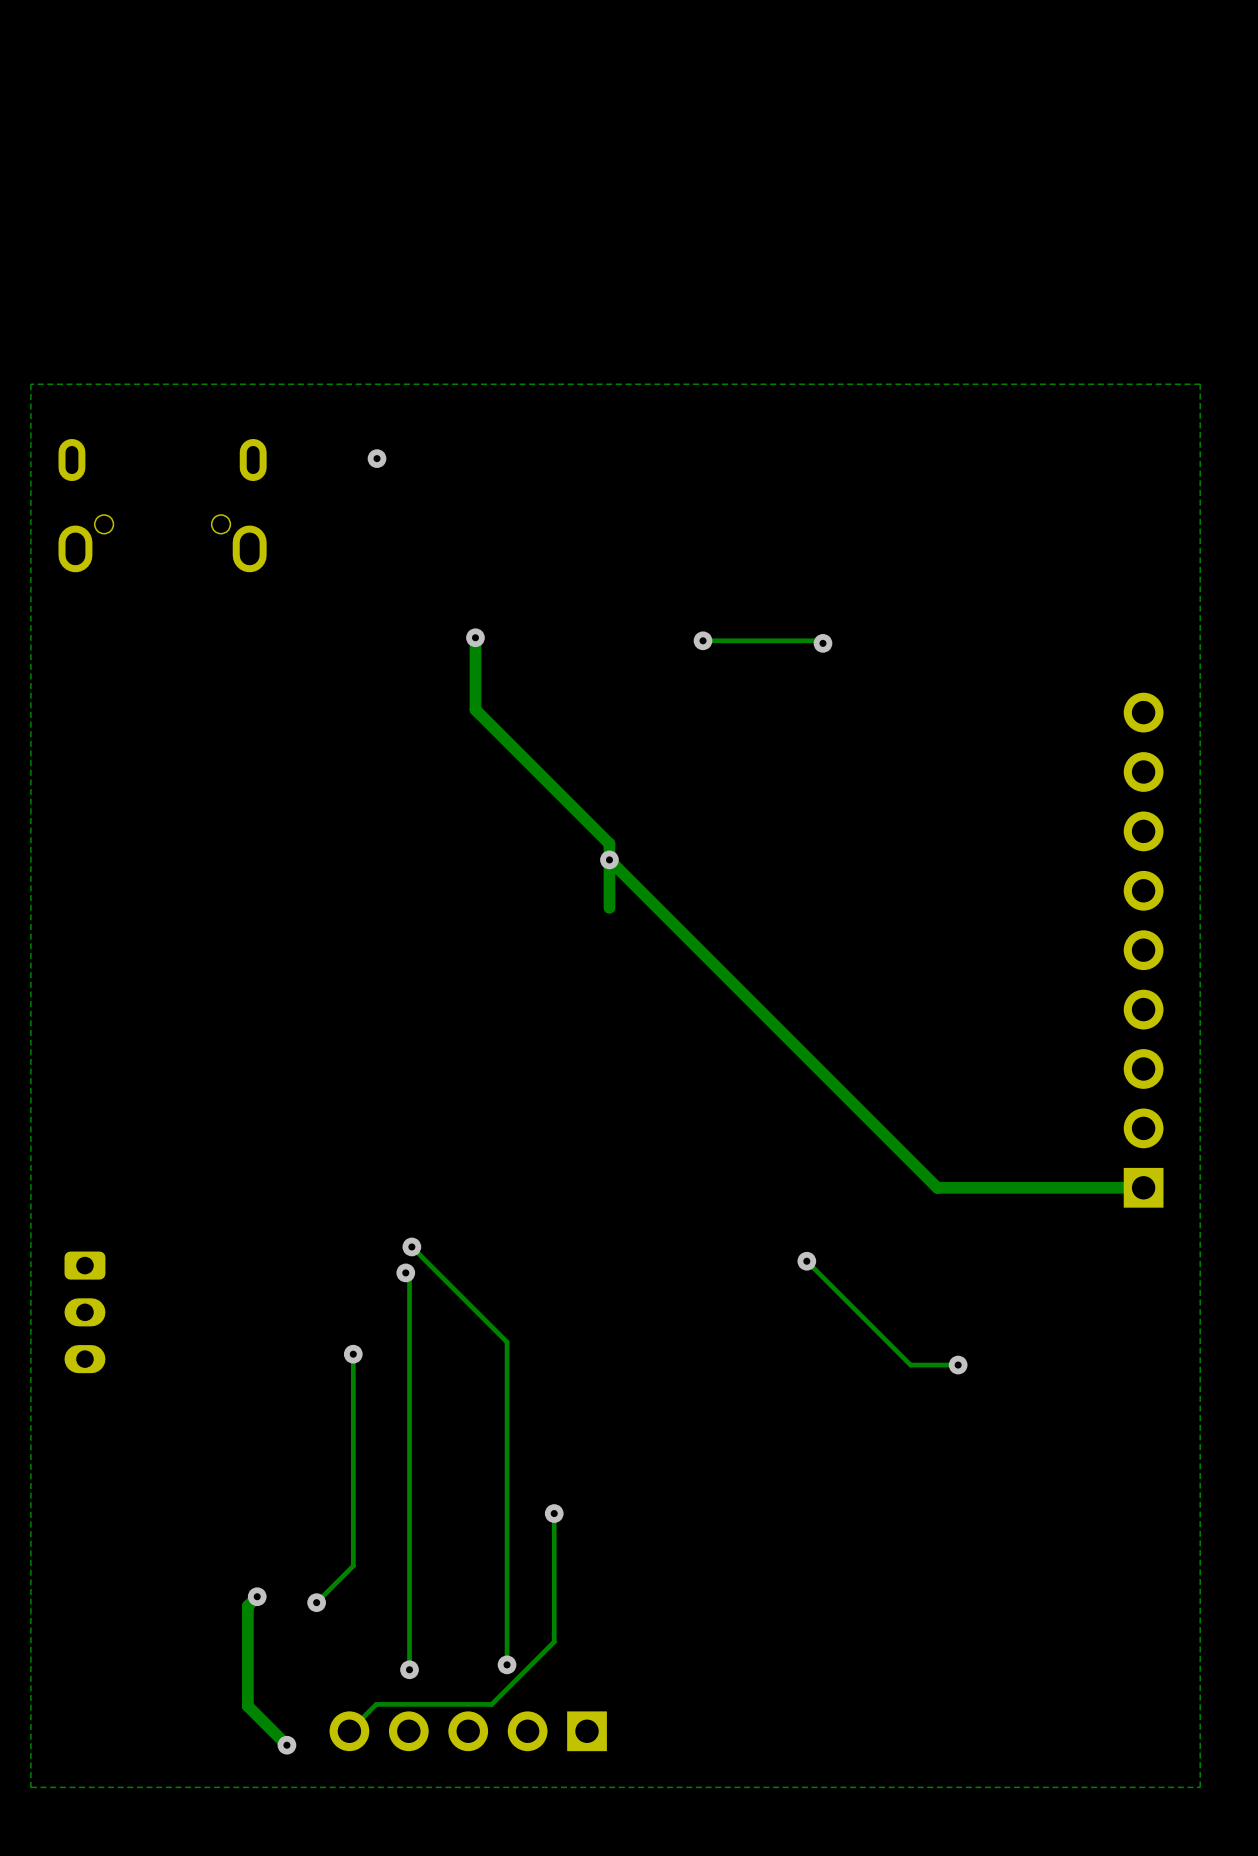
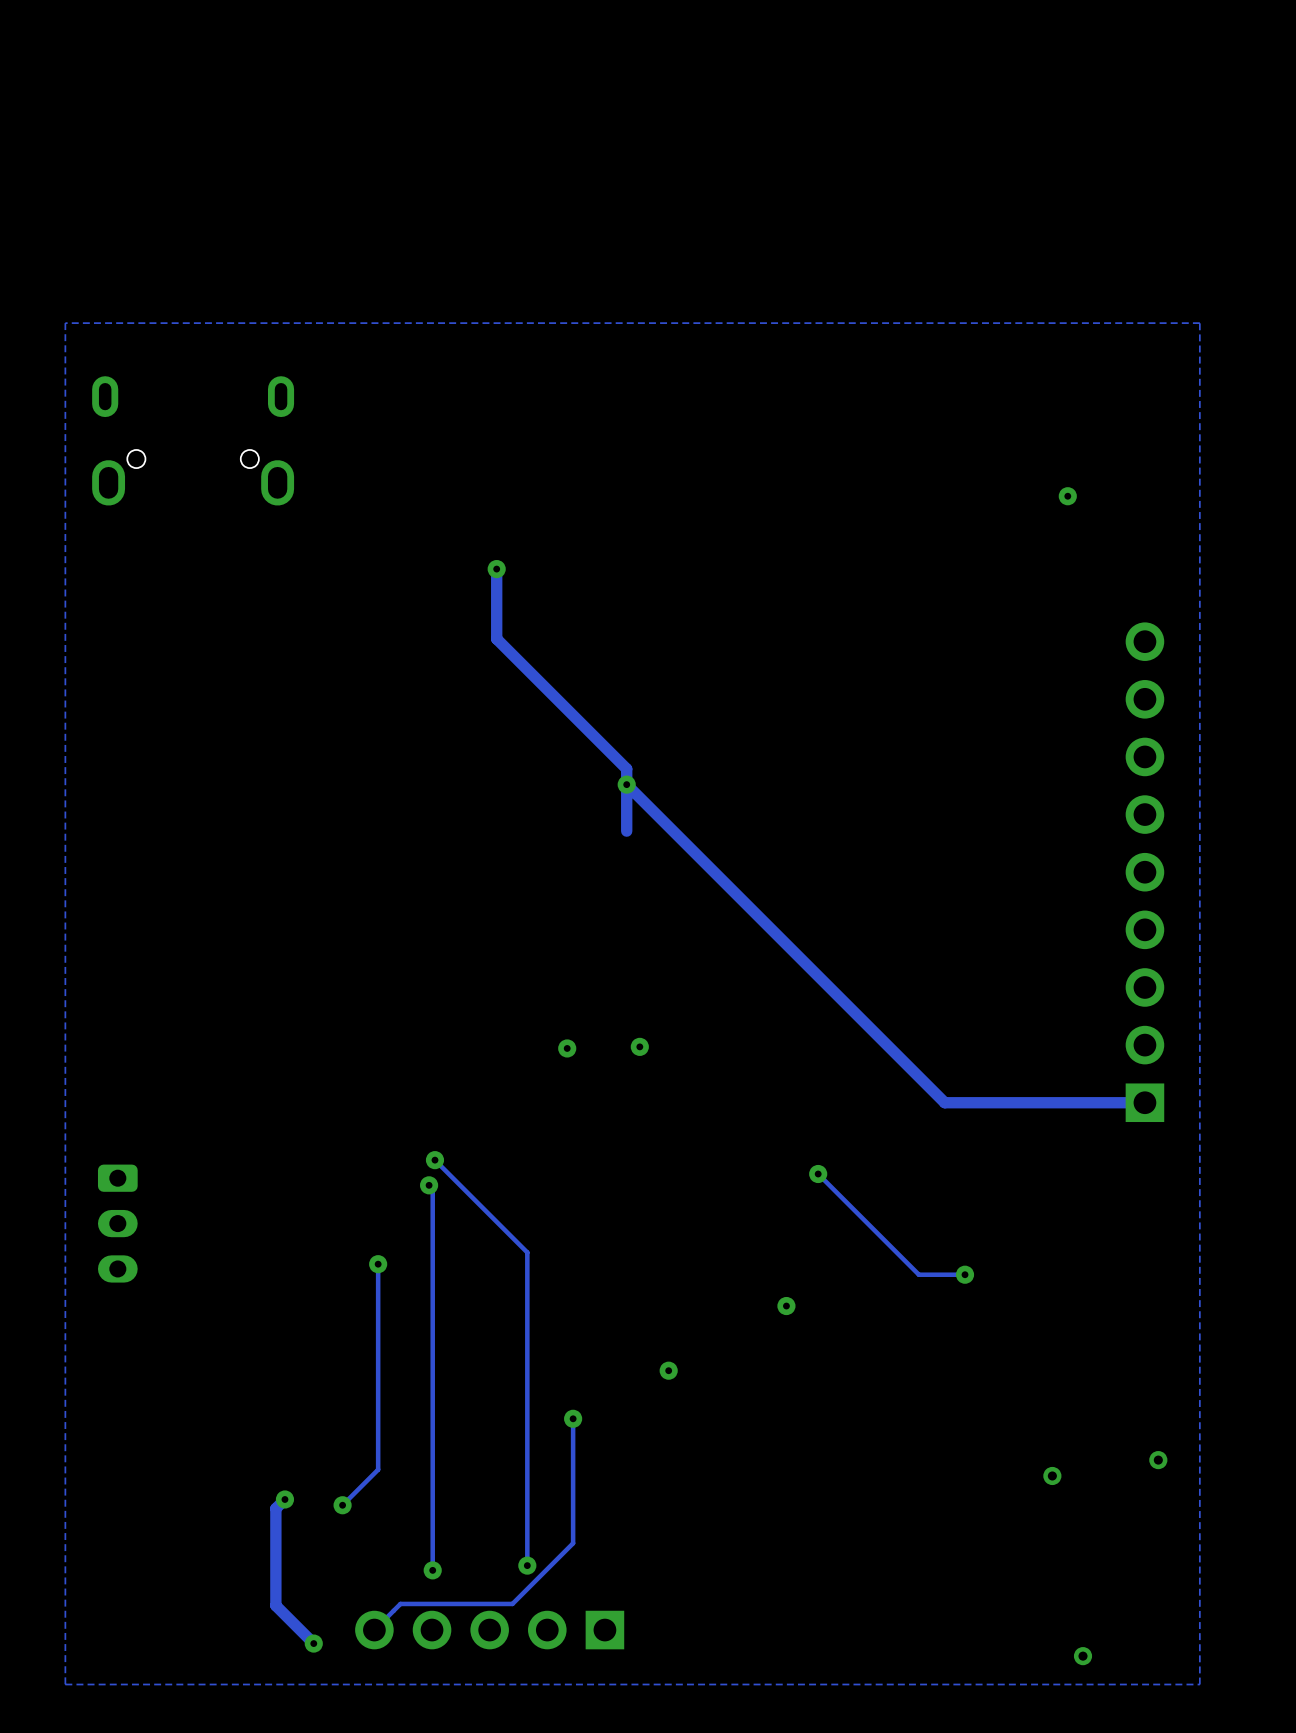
via: (377, 458) -> none
via: none -> (1067, 496)
track: (703, 640) (820, 640) (822, 643) -> none
via: (703, 640) -> none
via: (822, 643) -> none
via: none -> (639, 1046)
via: none -> (567, 1048)
via: none -> (786, 1306)
via: none -> (668, 1370)
via: none -> (1158, 1460)
via: none -> (1052, 1475)
via: none -> (1083, 1656)

